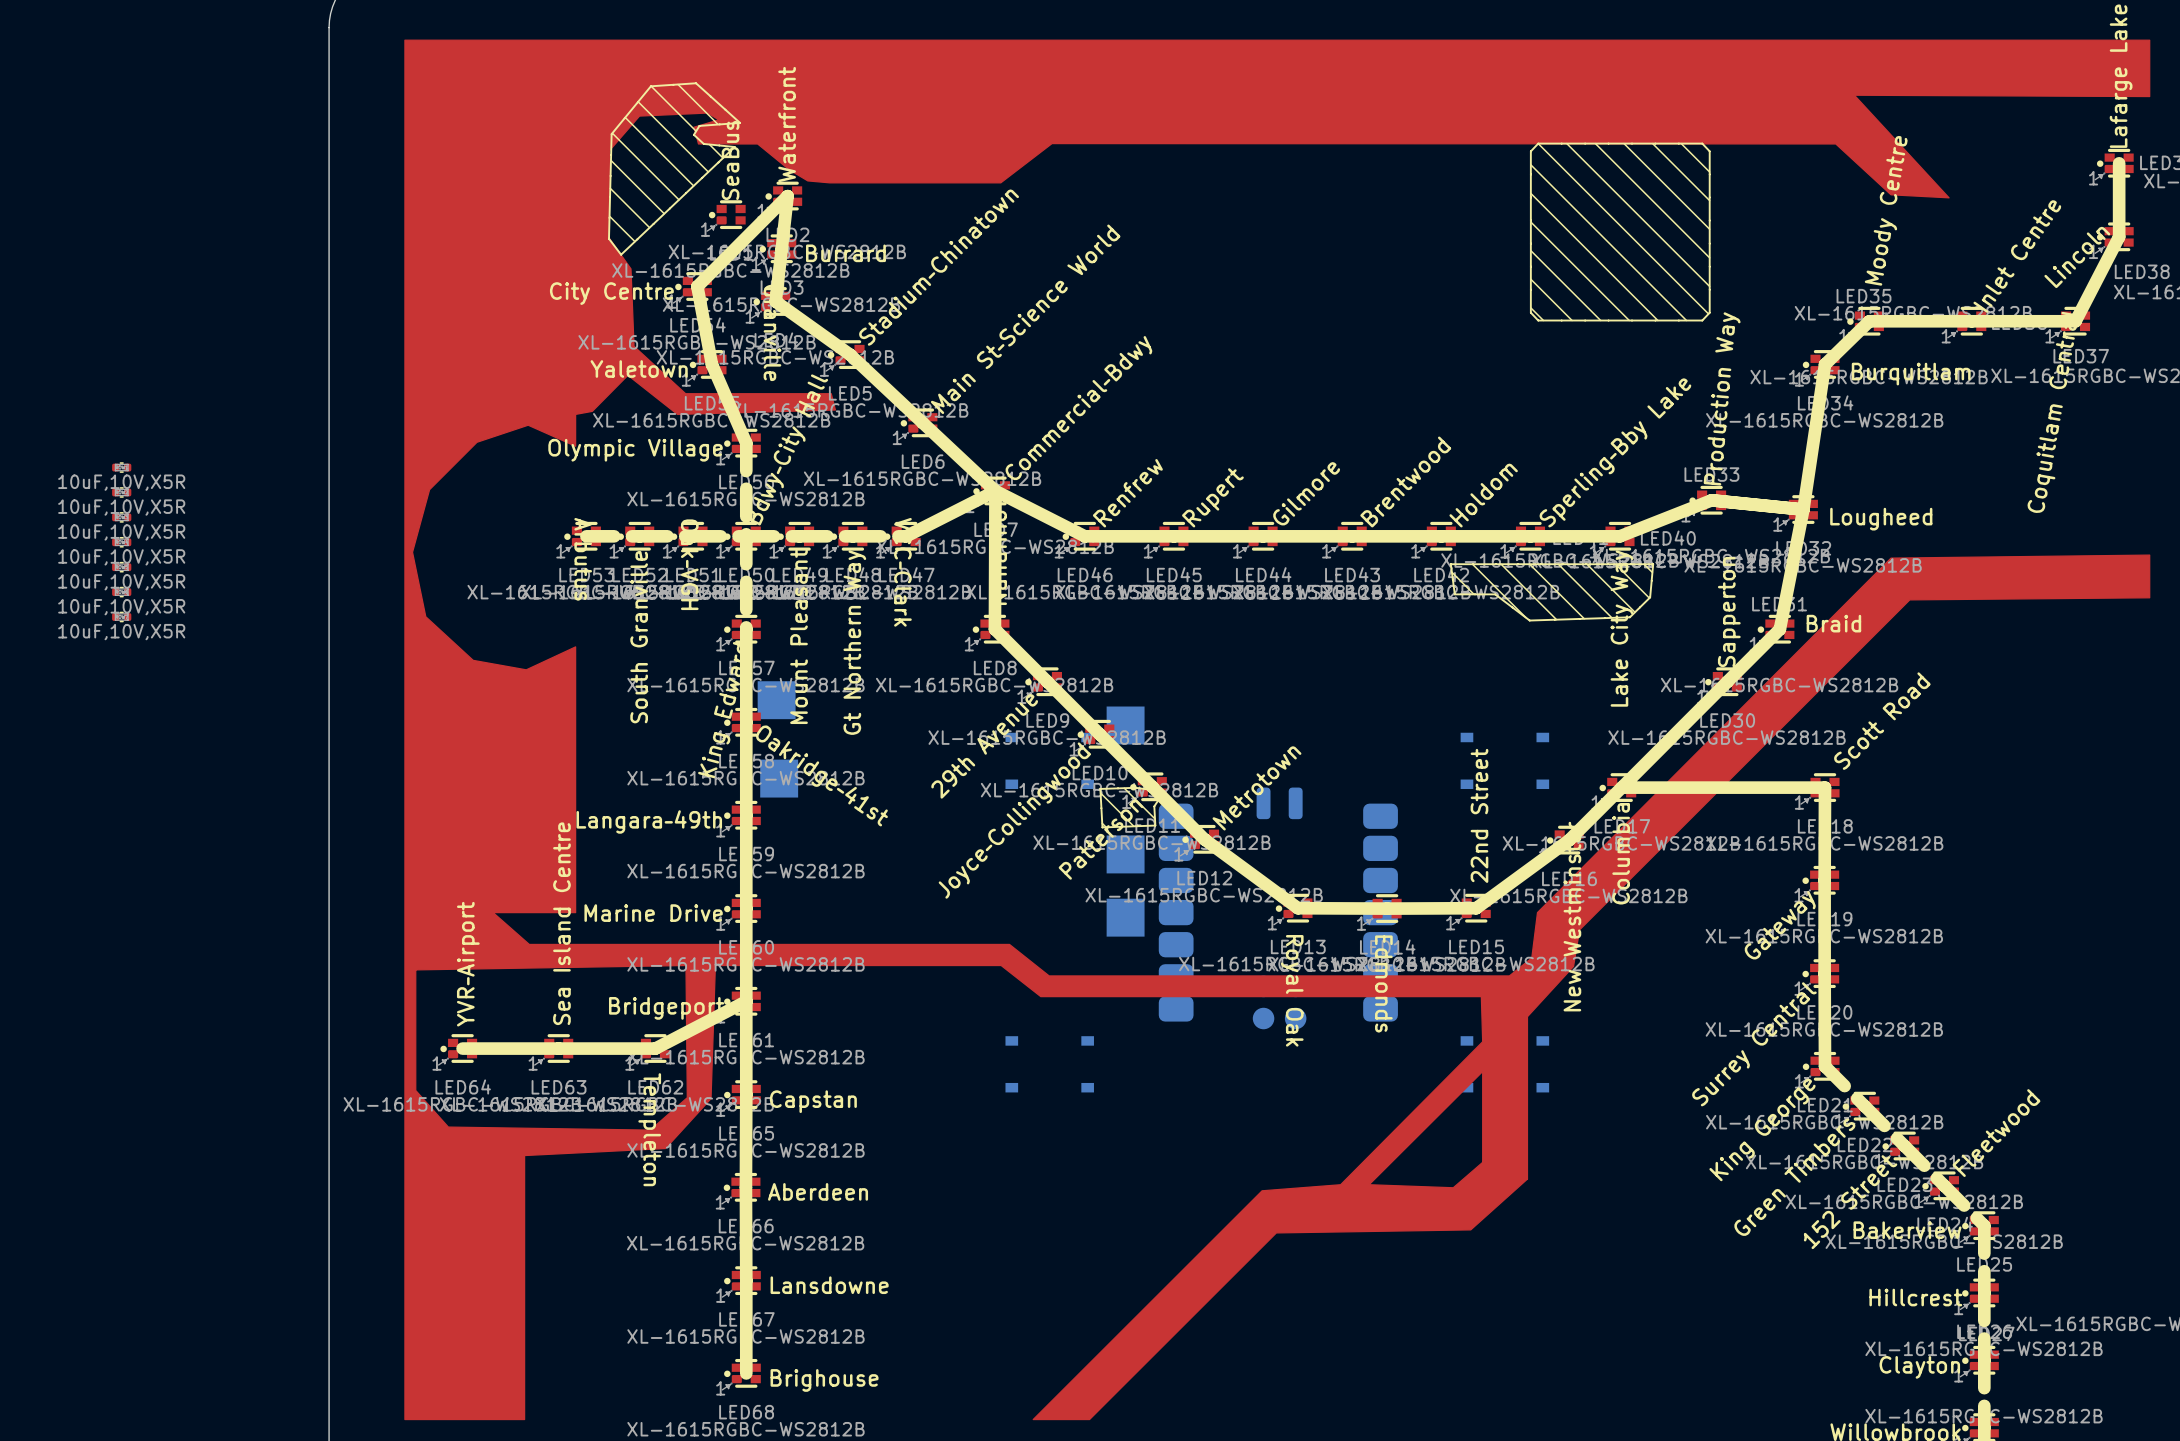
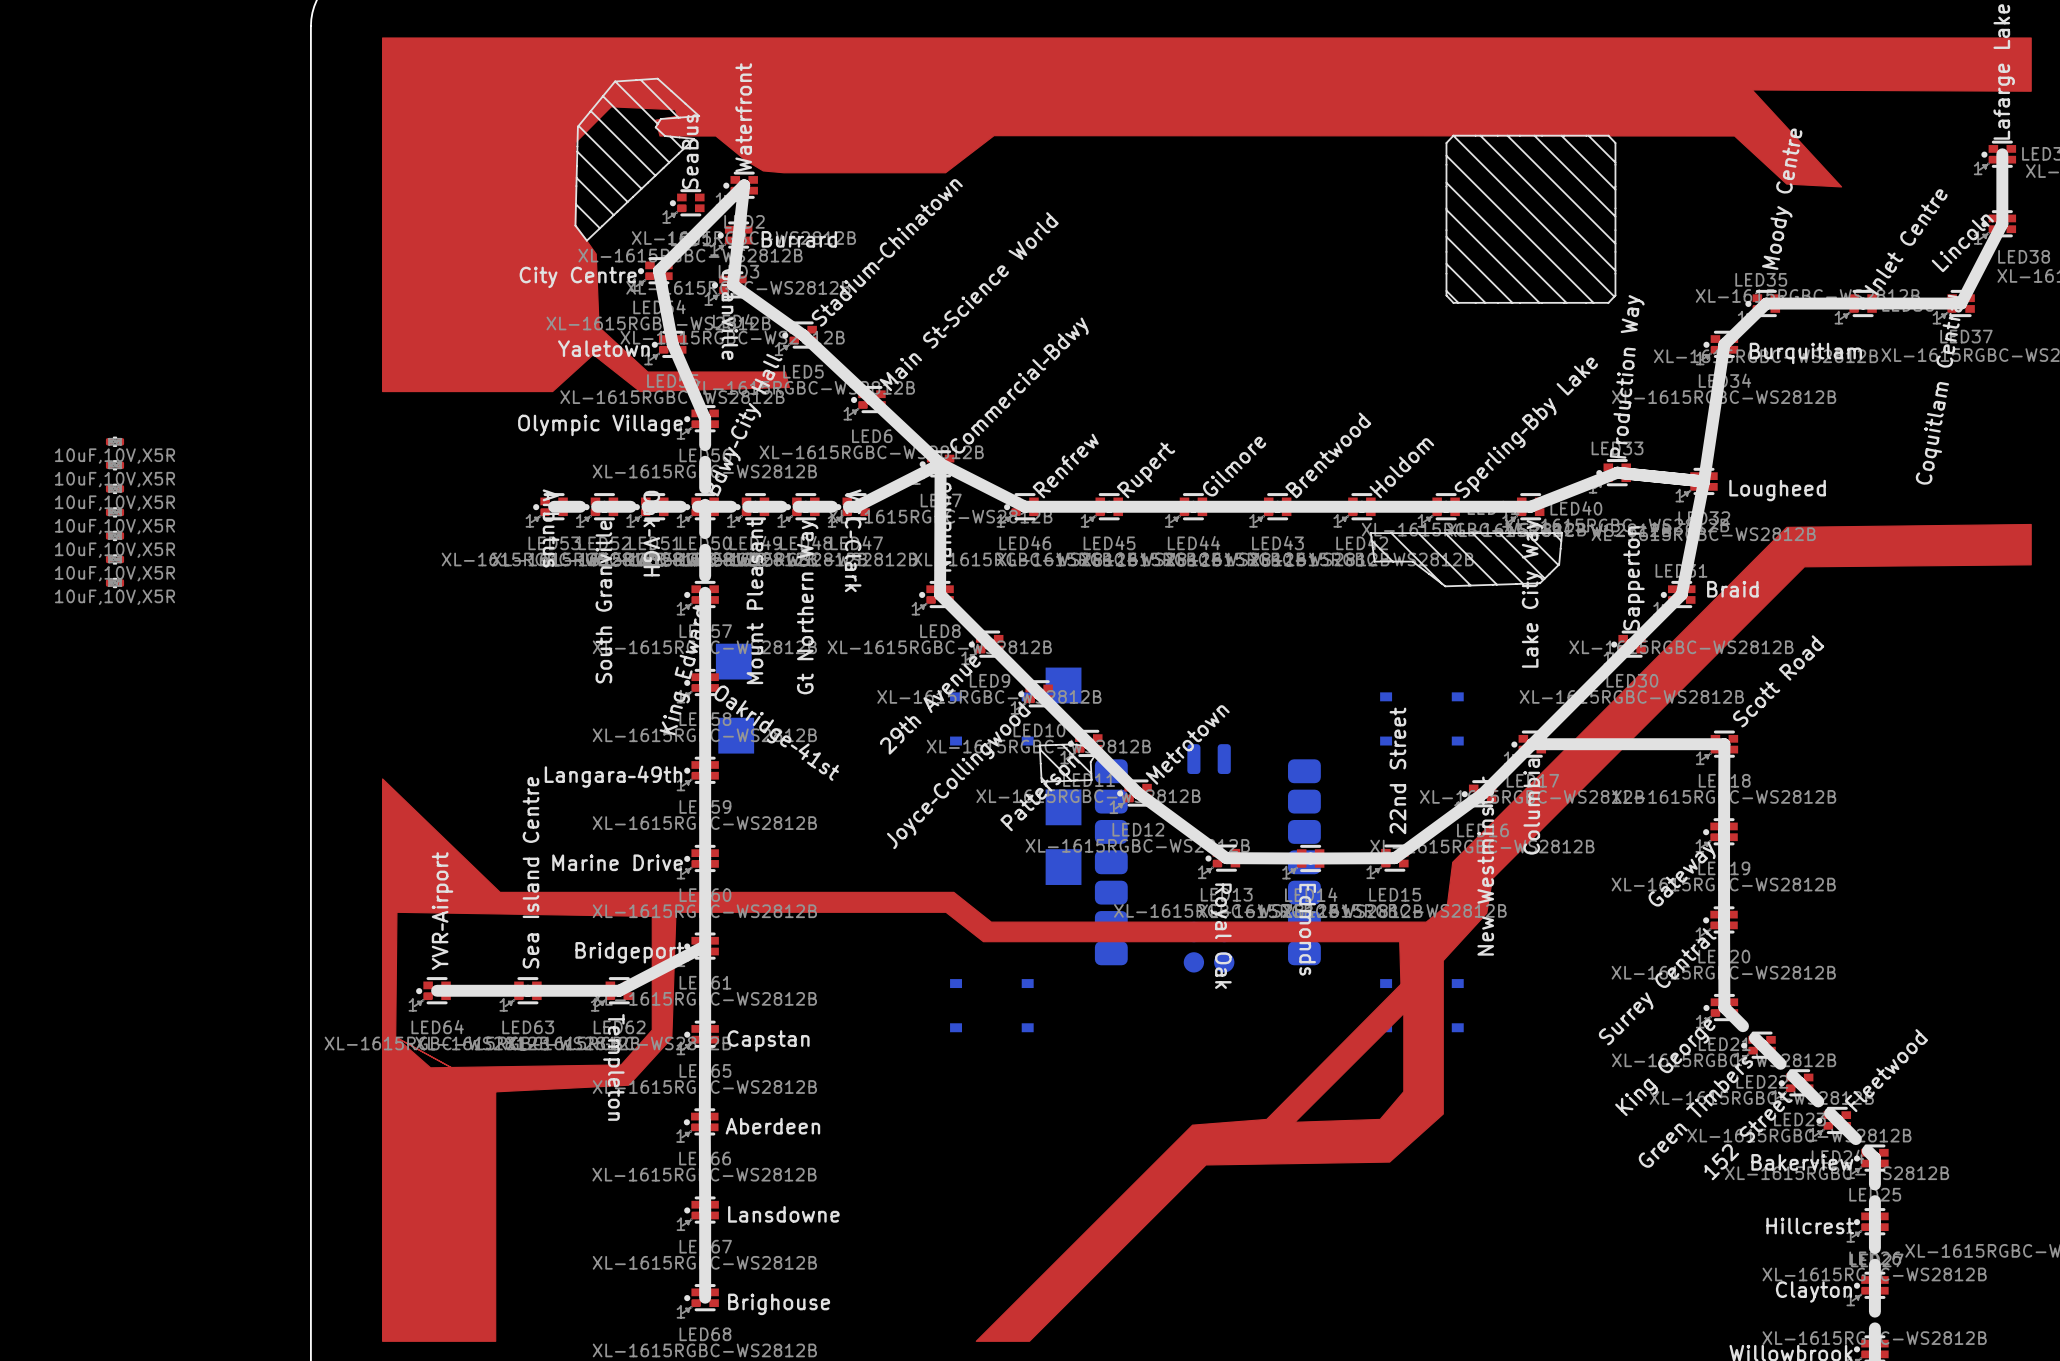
drawing: [404, 39, 2151, 1421] -> none
drawing: none -> [382, 37, 2032, 393]
drawing: none -> [382, 523, 2032, 1342]

